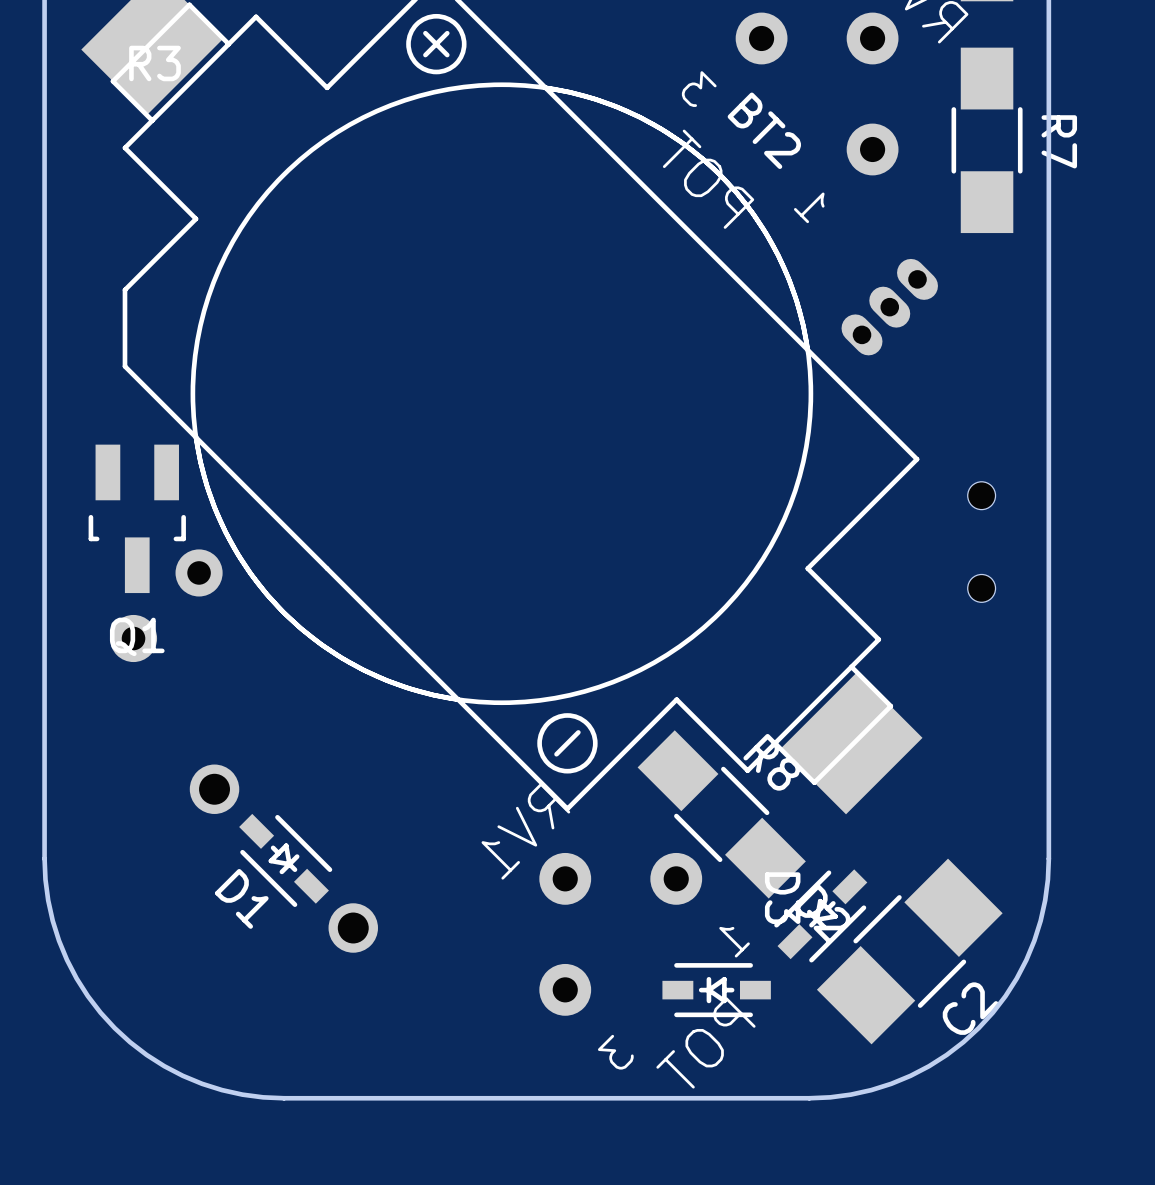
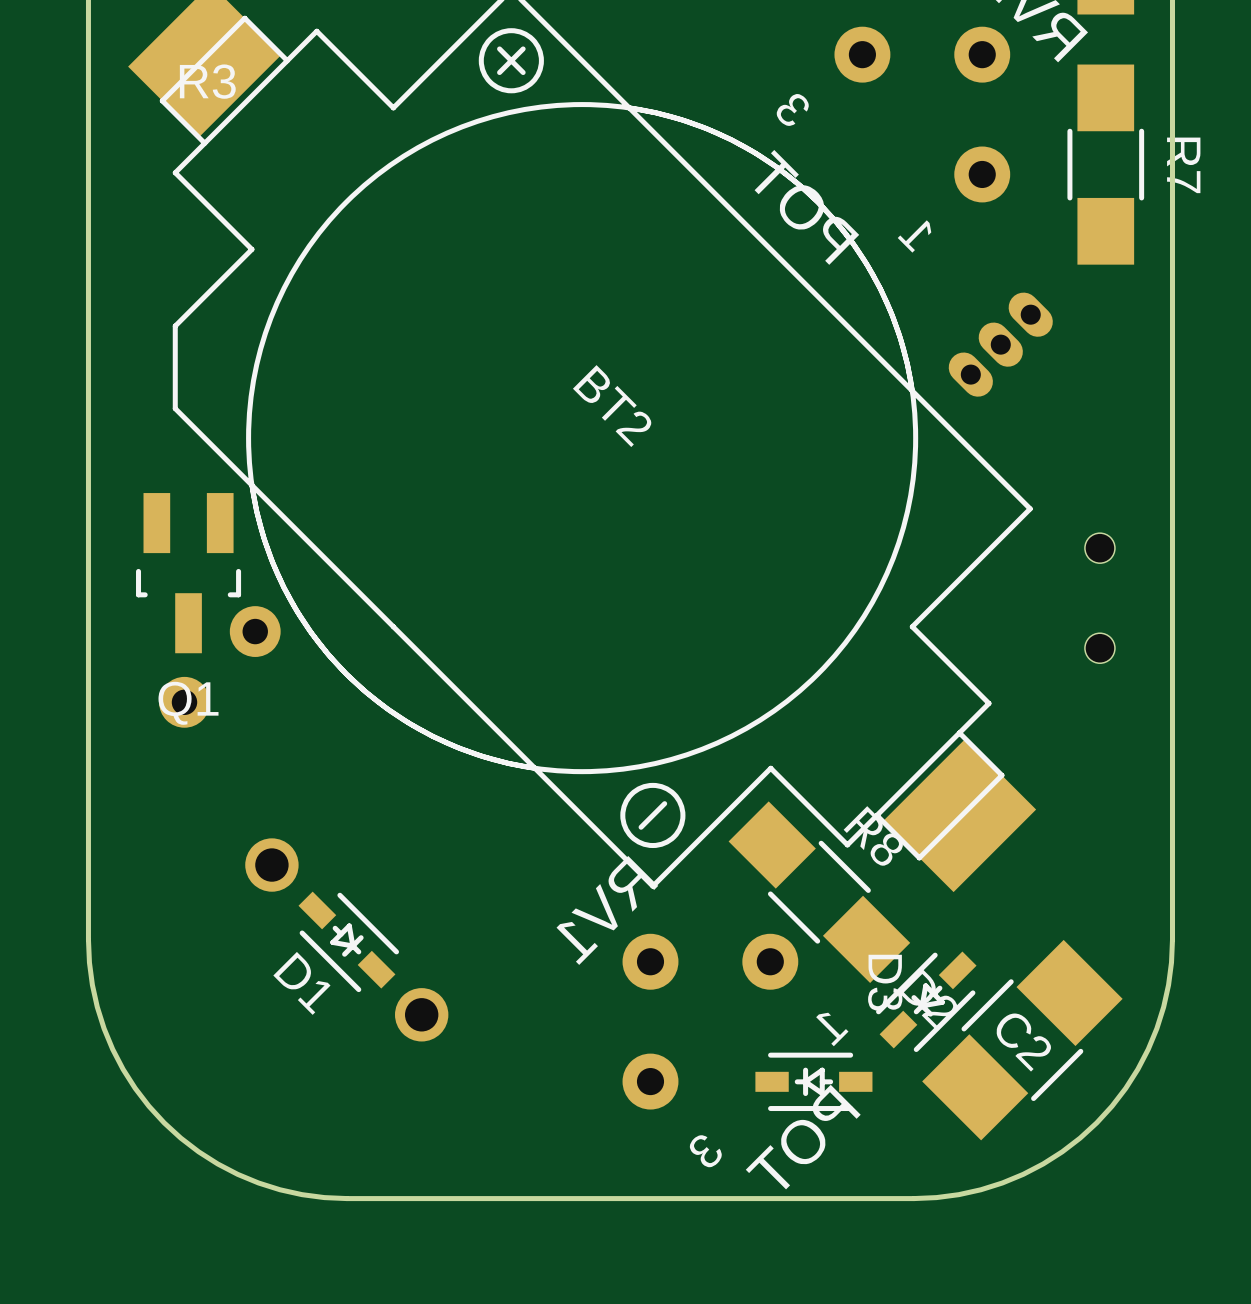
BT2 name position: BT2 (764, 130) -> BT2 (612, 406)
C2 name rotation: 0° (970, 1008) -> 90° clockwise (1023, 1042)

